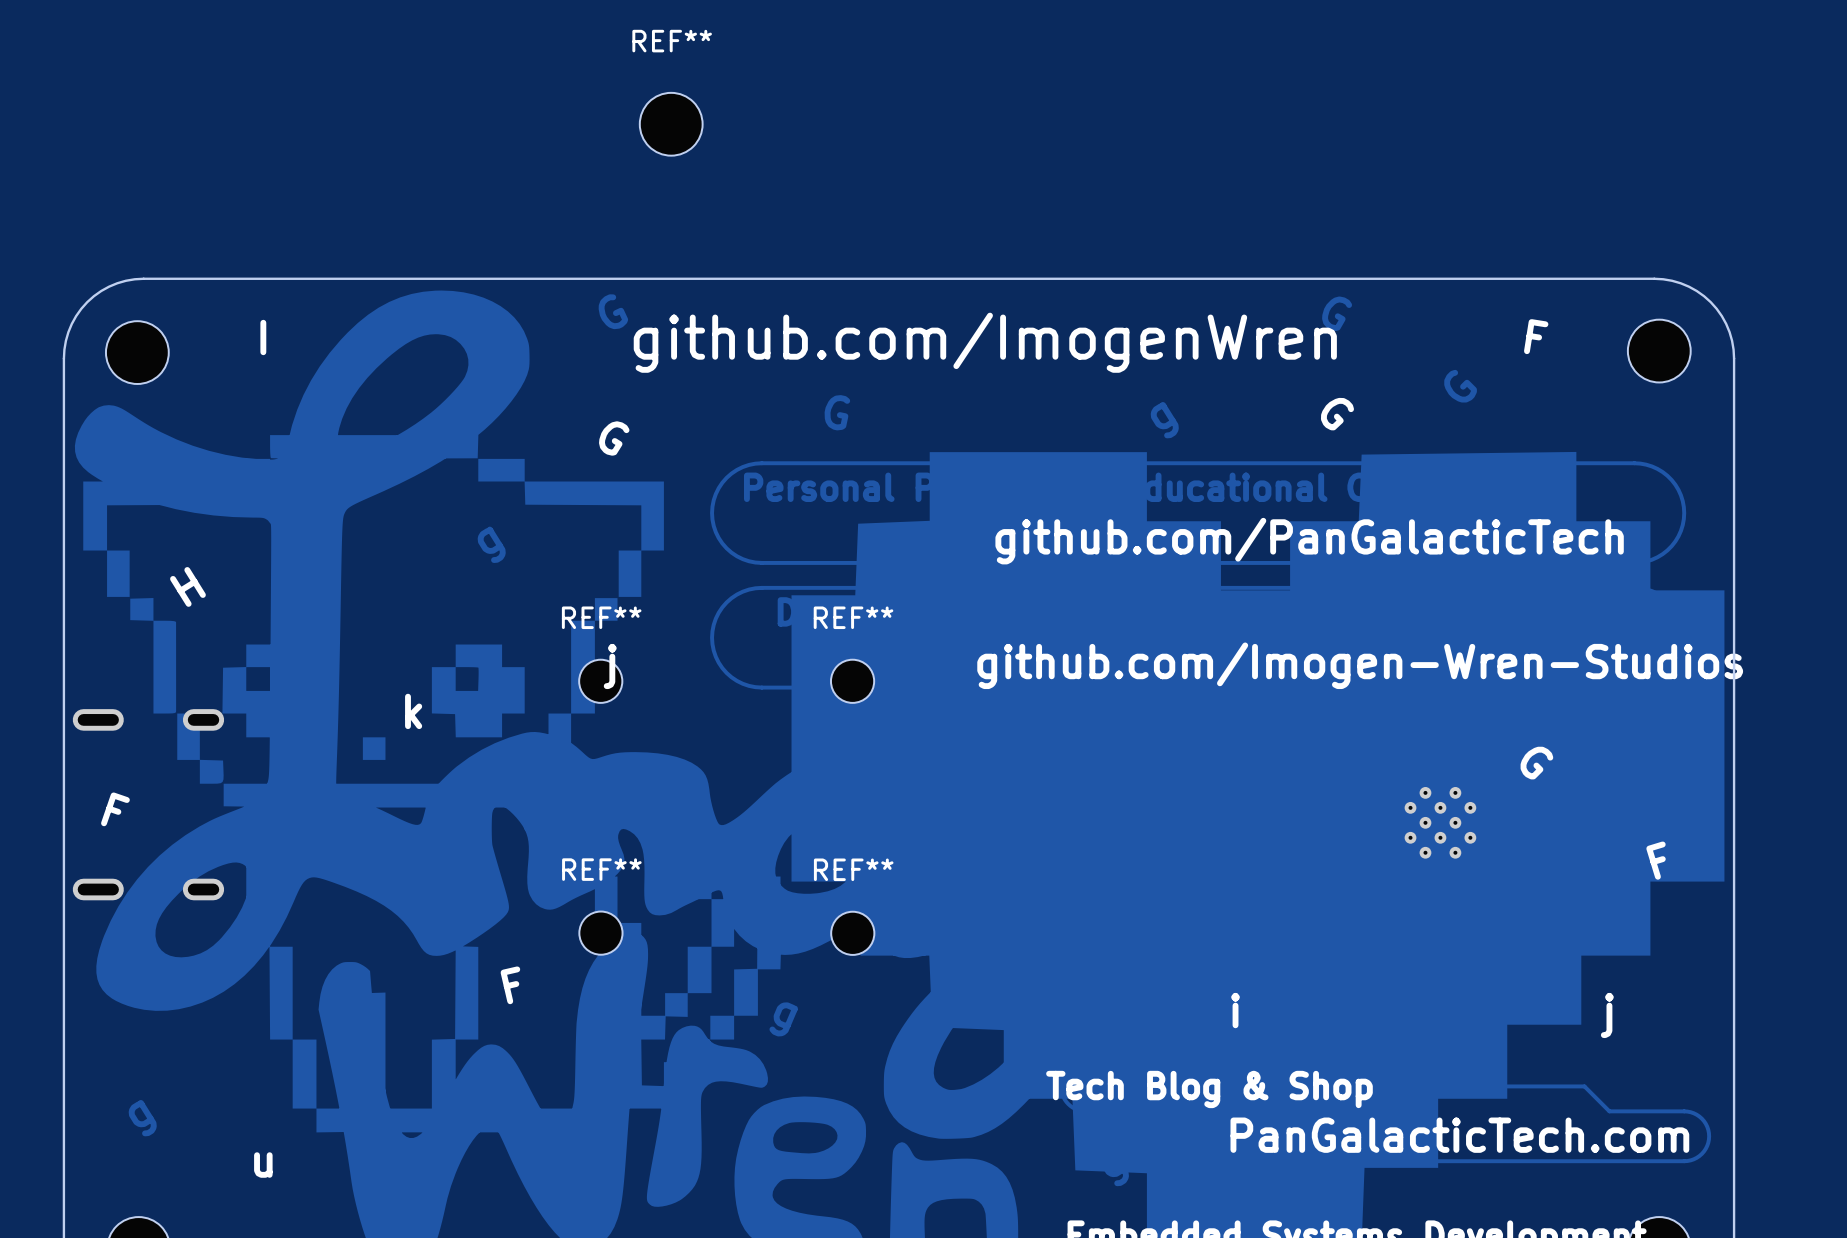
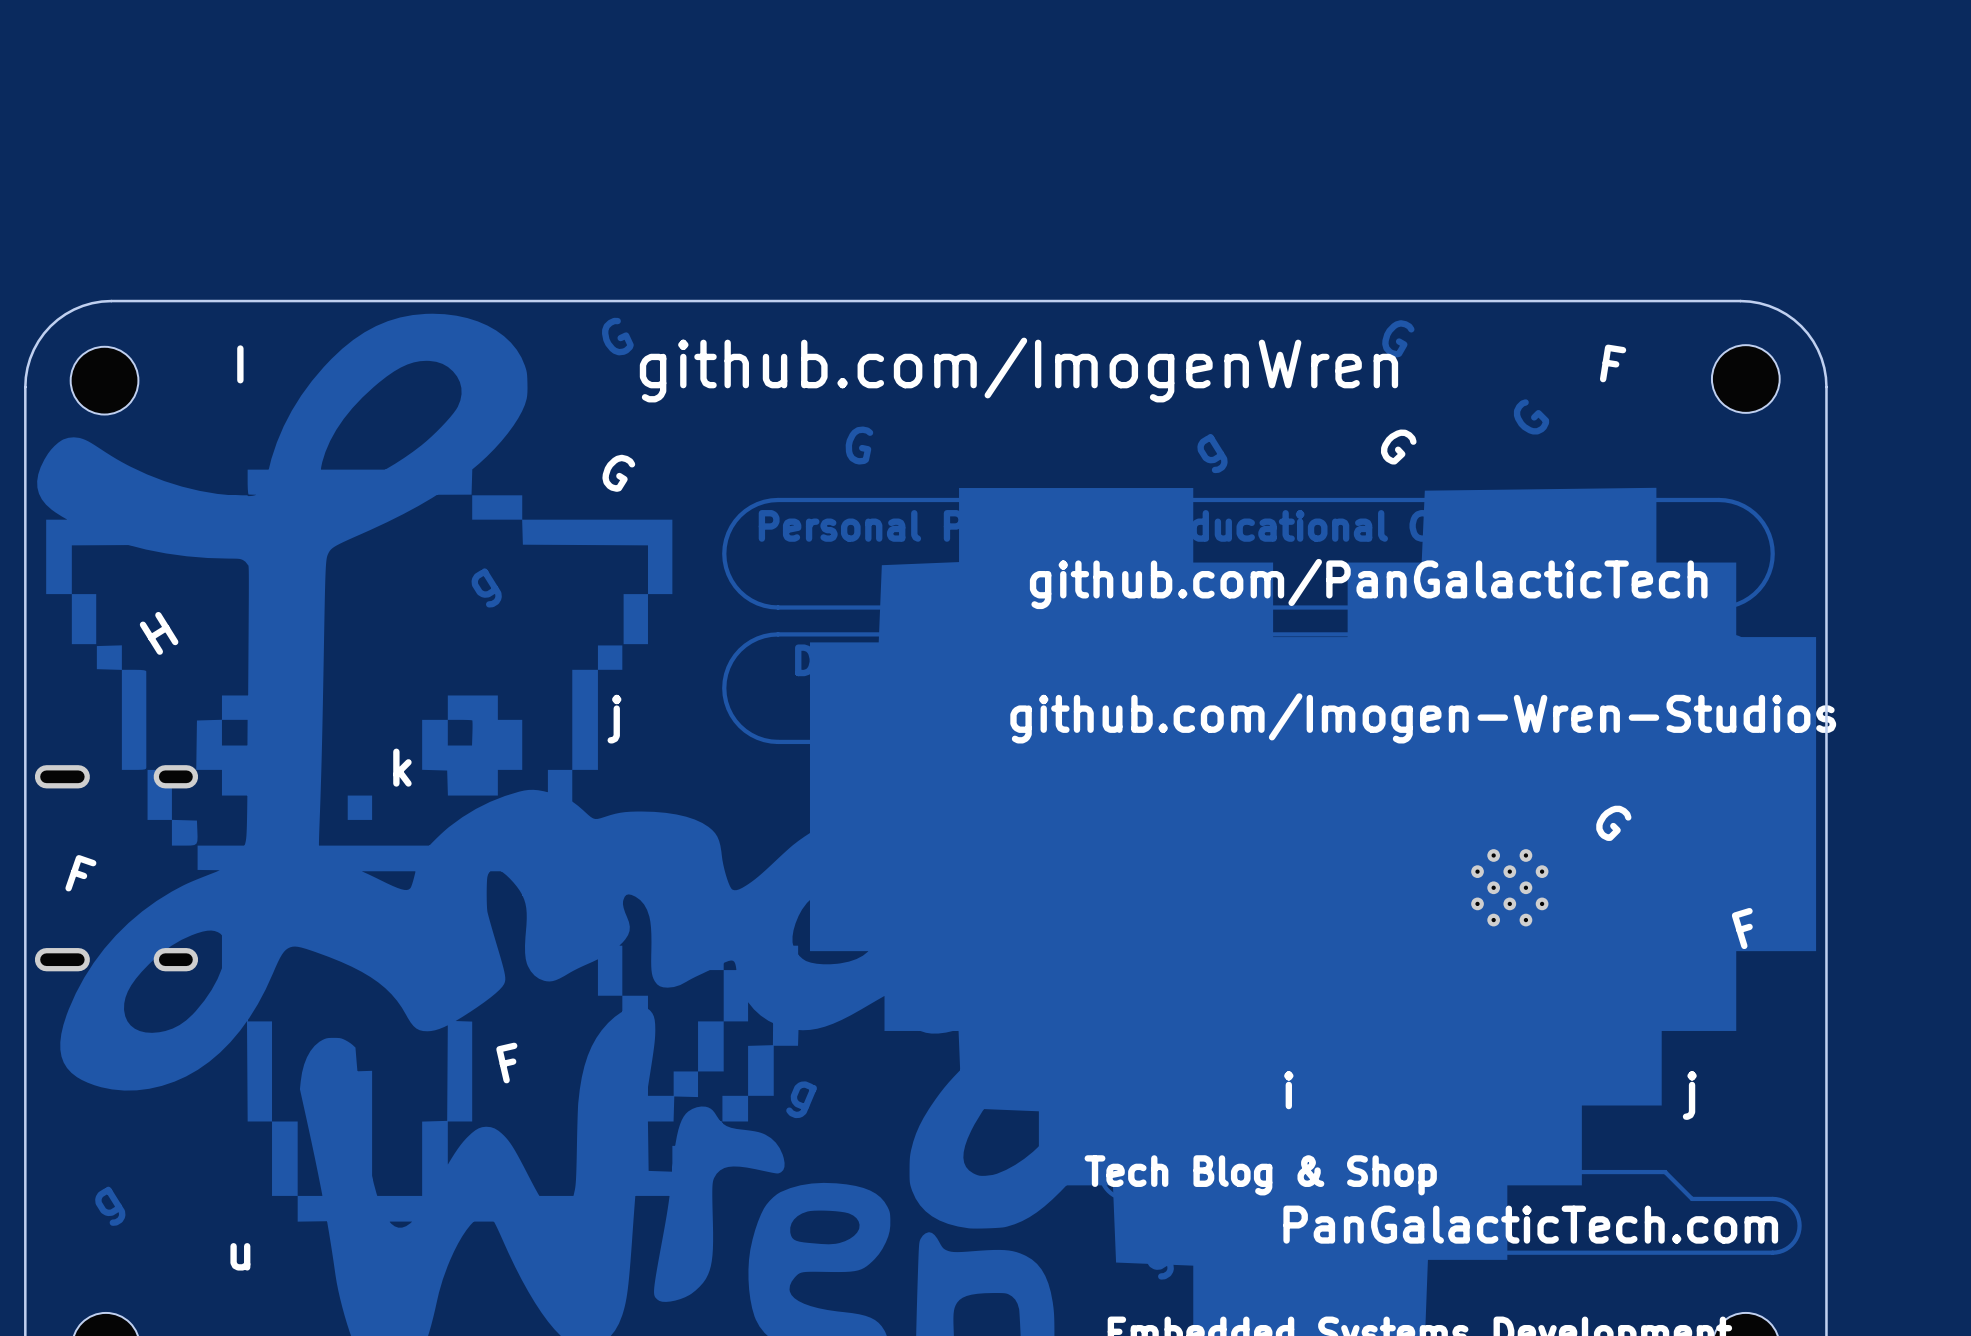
REF**: (671, 124) -> none
REF**: (600, 681) -> none
REF**: (852, 681) -> none
REF**: (600, 933) -> none
REF**: (852, 933) -> none

